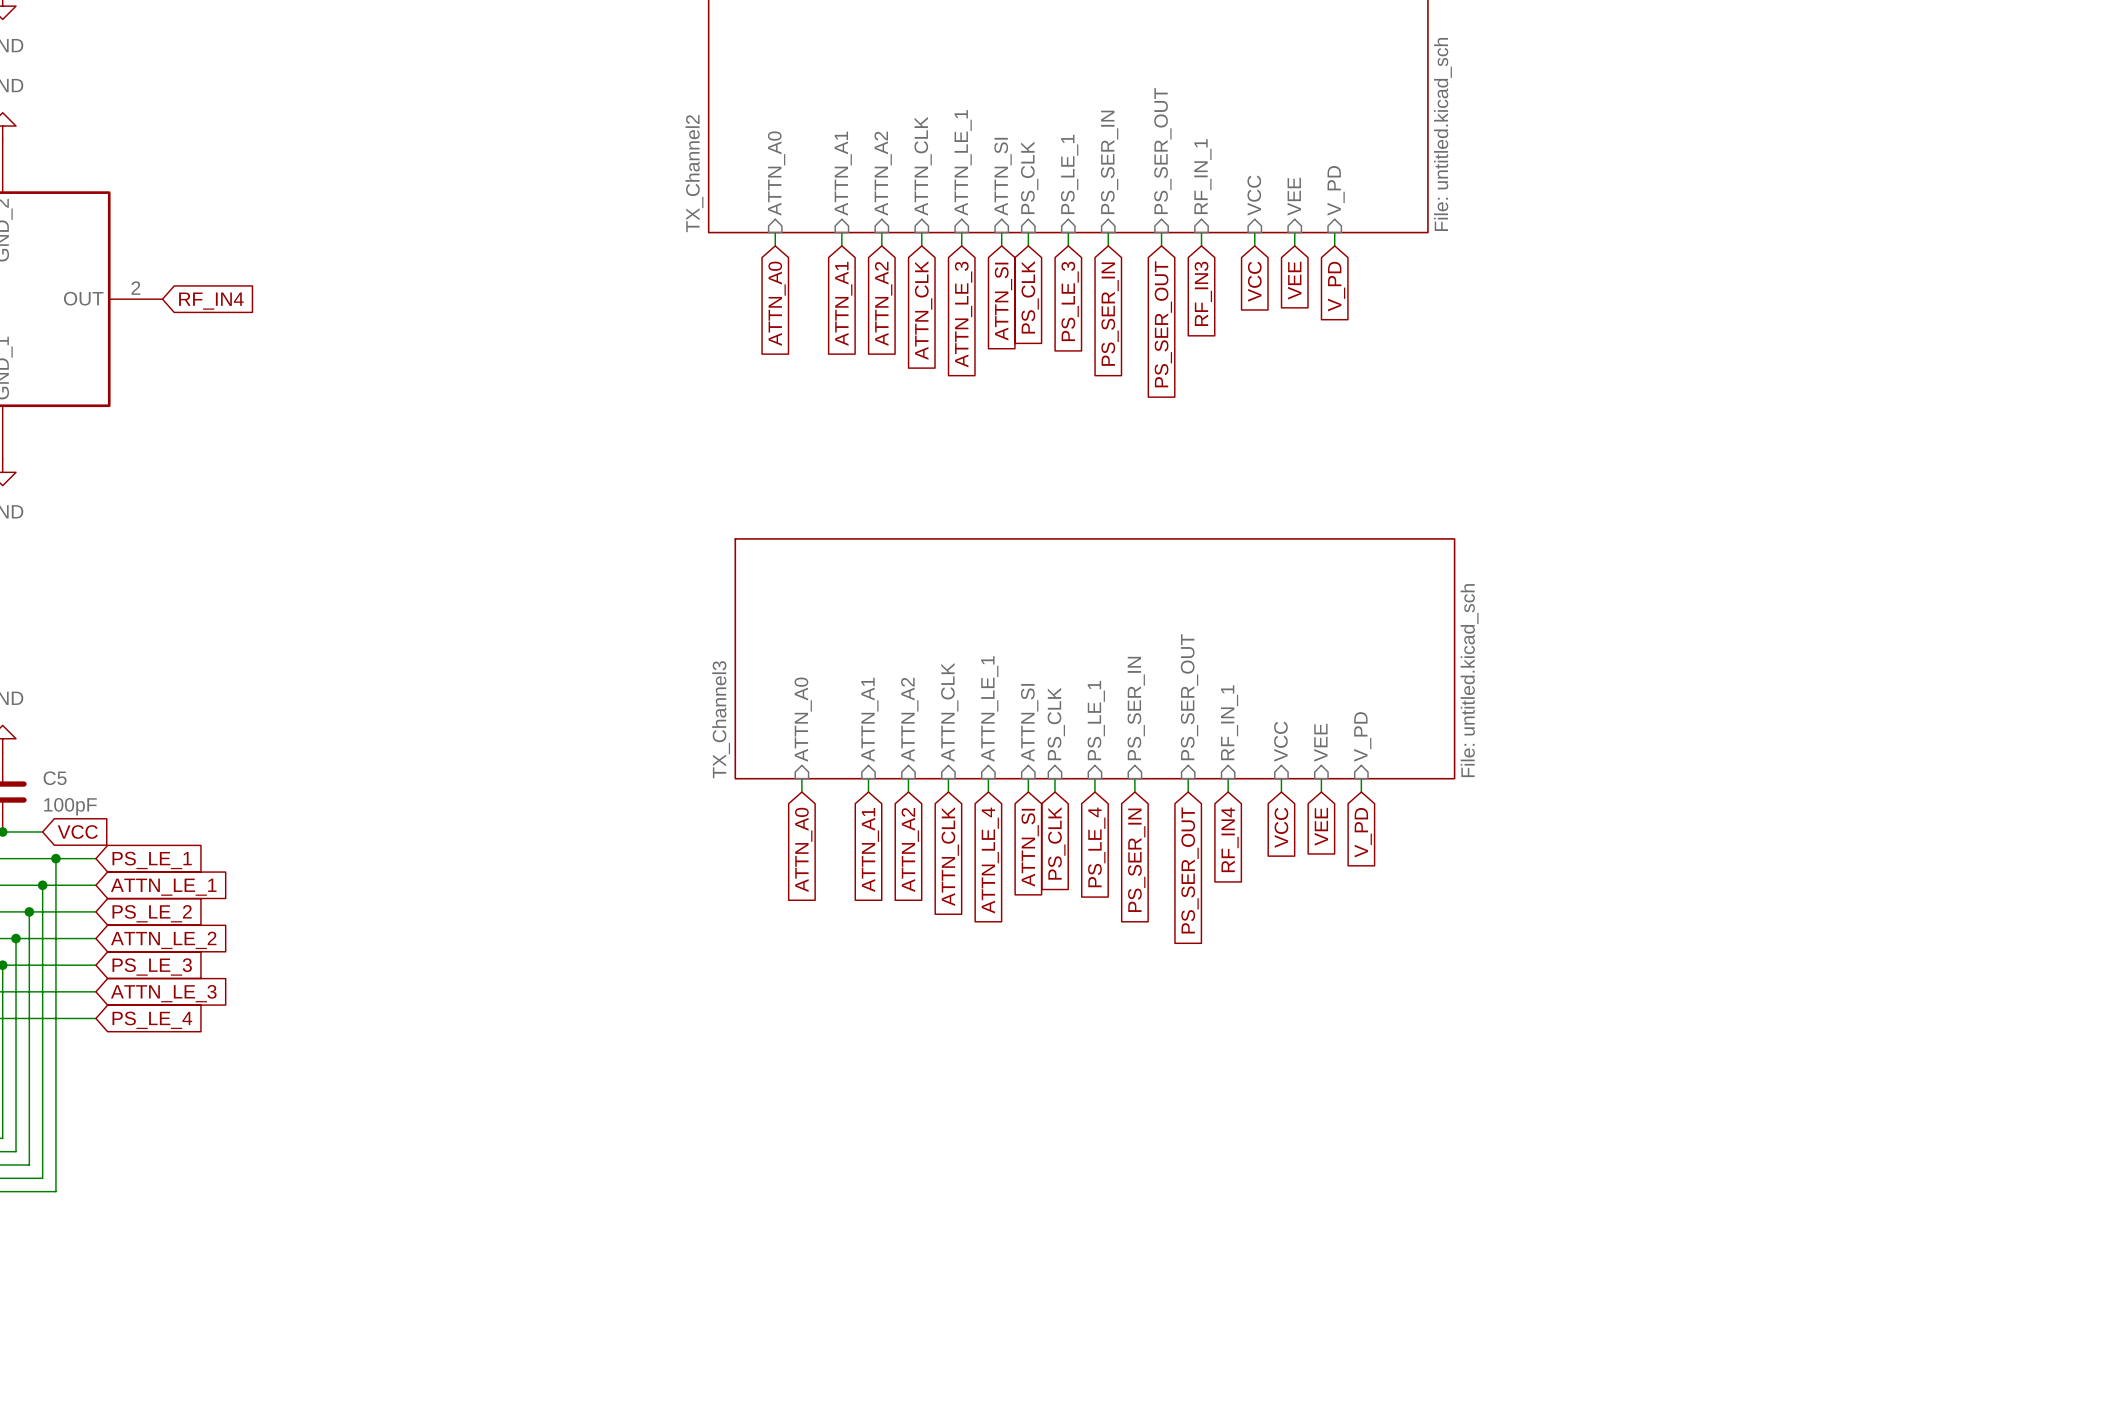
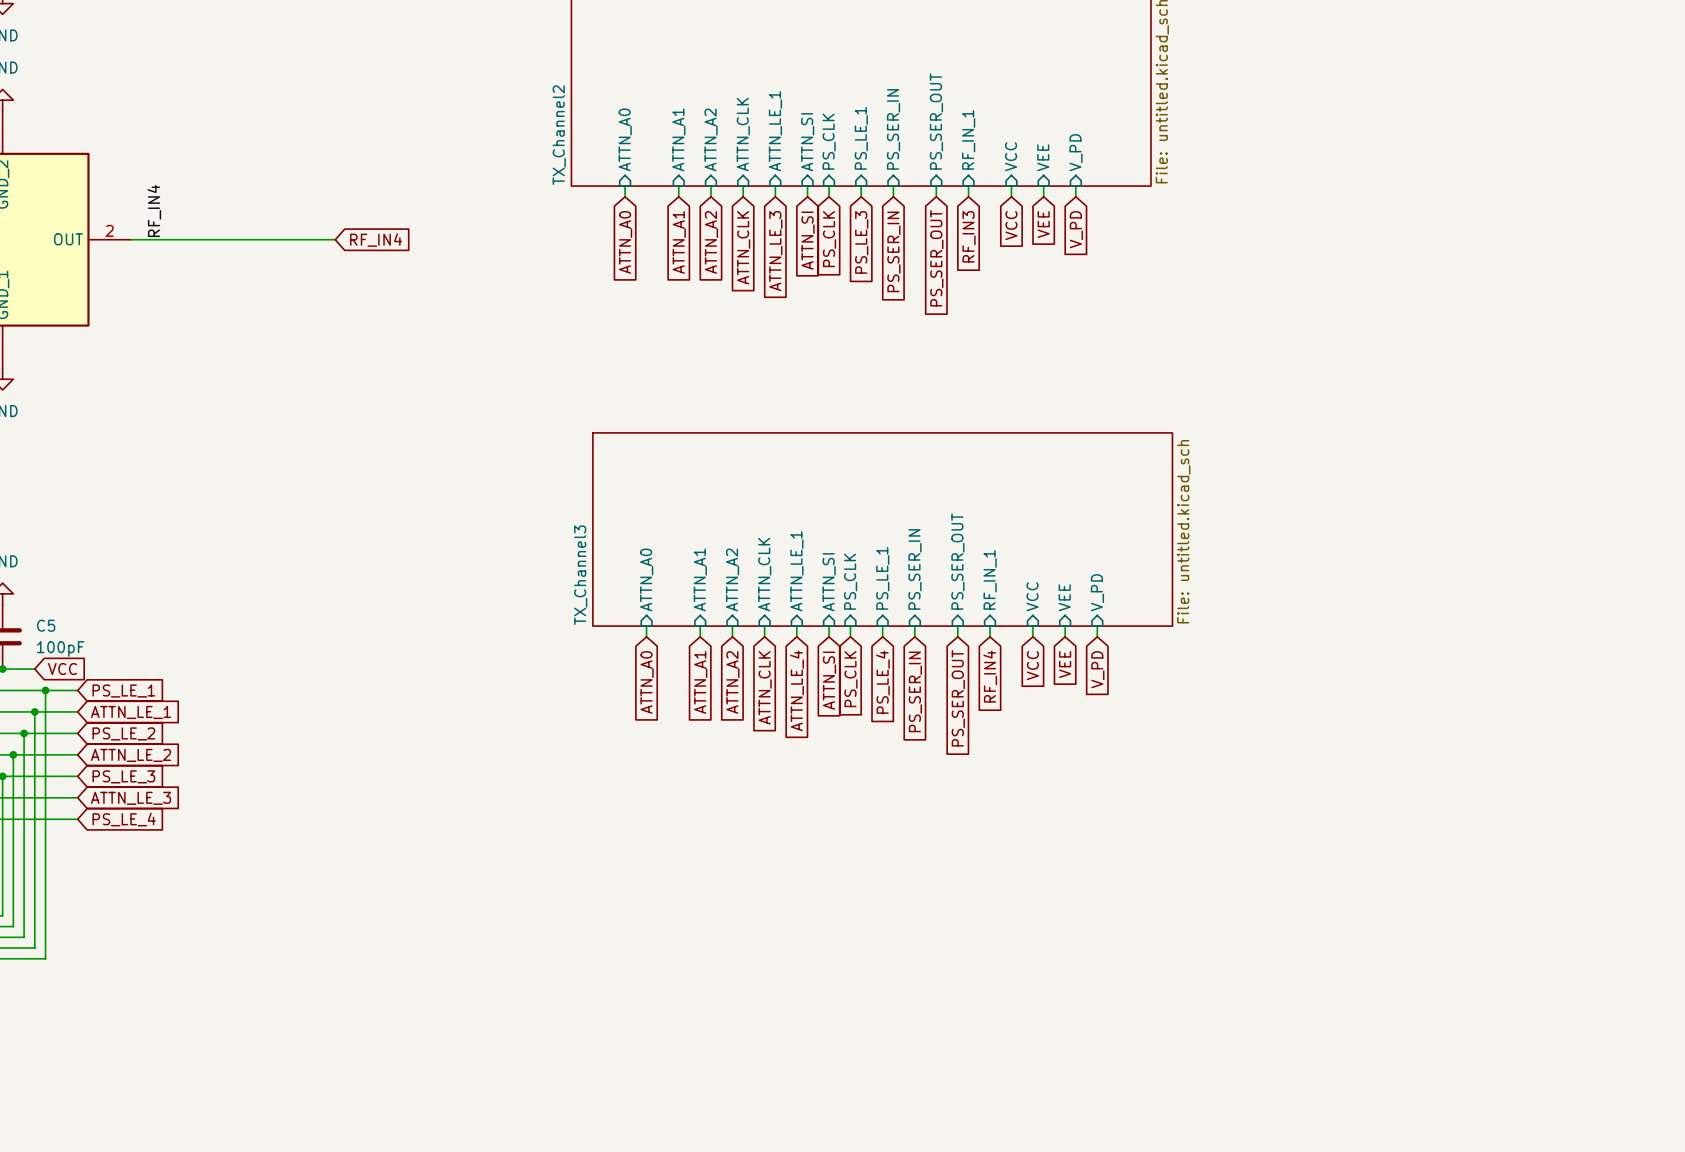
label: none -> RF_IN4 (154, 211)
wire: none -> (131, 239) (335, 239)
global label position: RF_IN4 (211, 301) -> RF_IN4 (376, 239)

